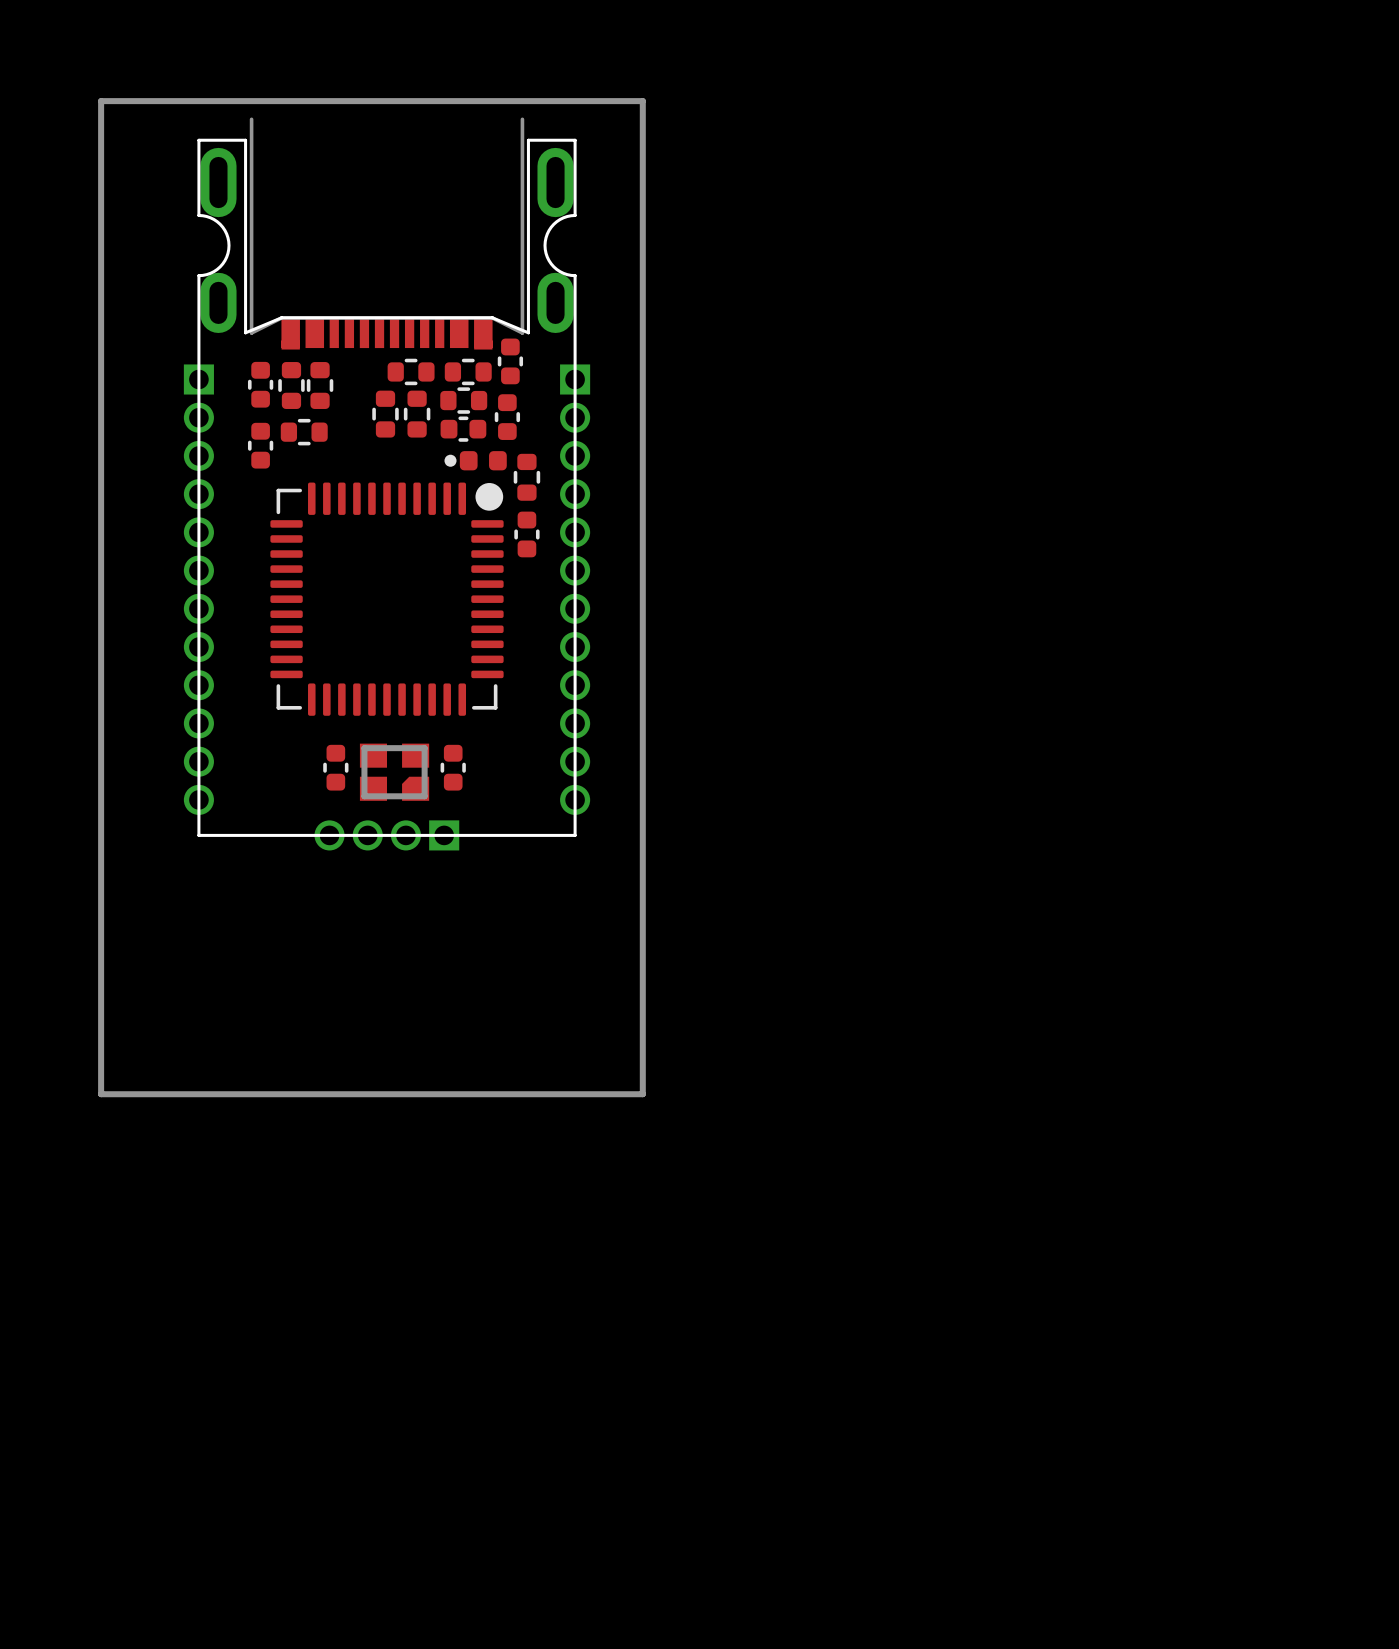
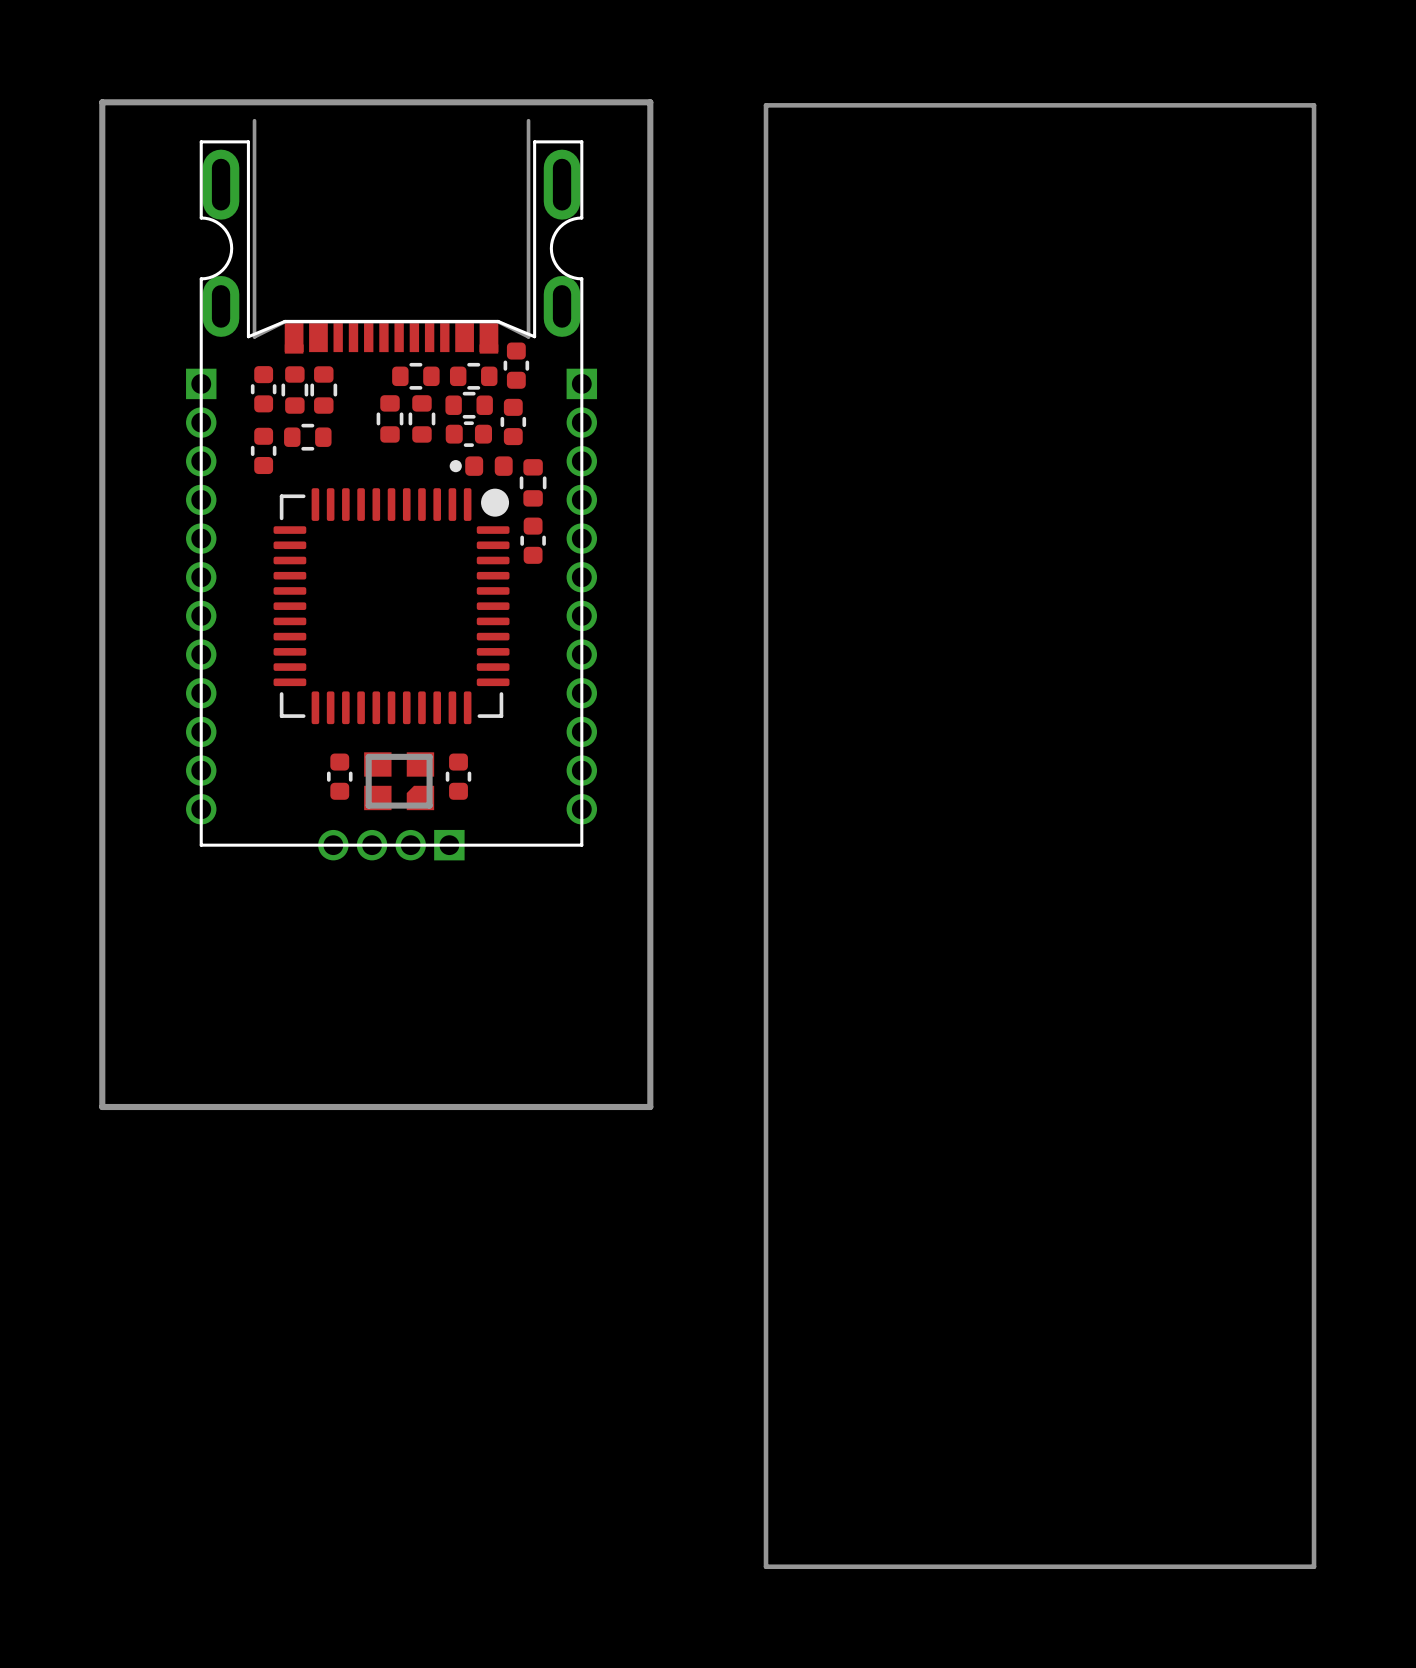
line: none -> (766, 105) (1314, 105) (1314, 1566) (766, 1566) (766, 105)

